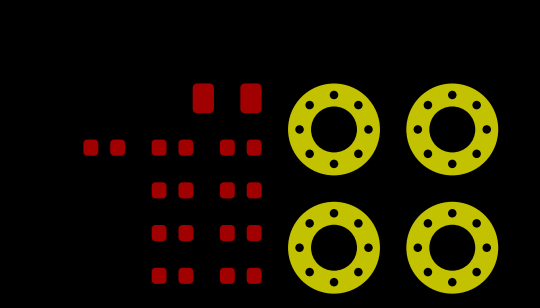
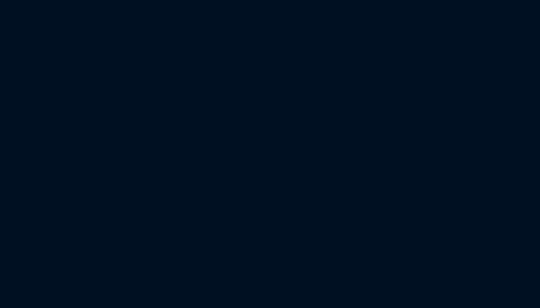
part: (227, 98) -> none
part: (334, 129) -> none
part: (452, 129) -> none
part: (104, 147) -> none
part: (172, 147) -> none
part: (240, 147) -> none
part: (172, 190) -> none
part: (240, 190) -> none
part: (172, 233) -> none
part: (240, 233) -> none
part: (334, 247) -> none
part: (452, 247) -> none
part: (172, 275) -> none
part: (240, 275) -> none

